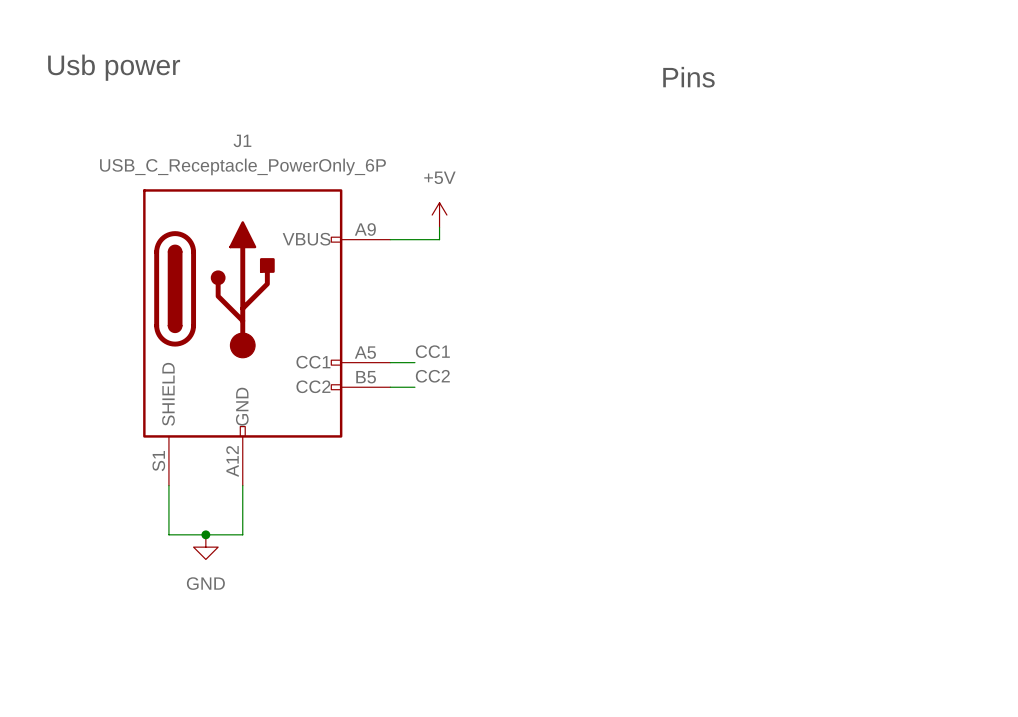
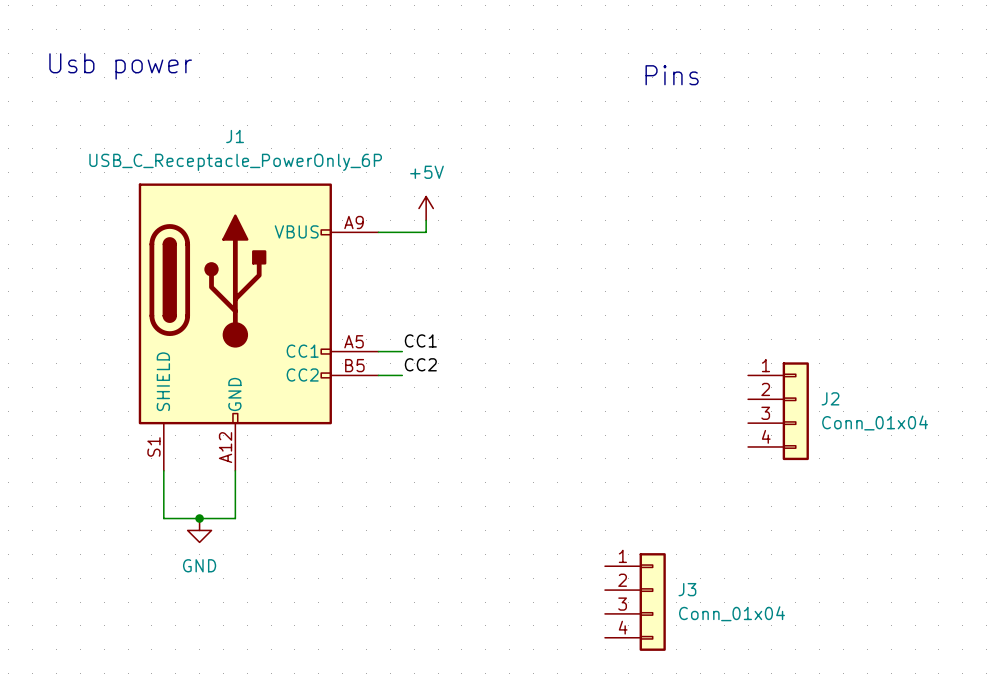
J2: none -> Conn_01x04 (778, 411)
J3: none -> Conn_01x04 (635, 602)

